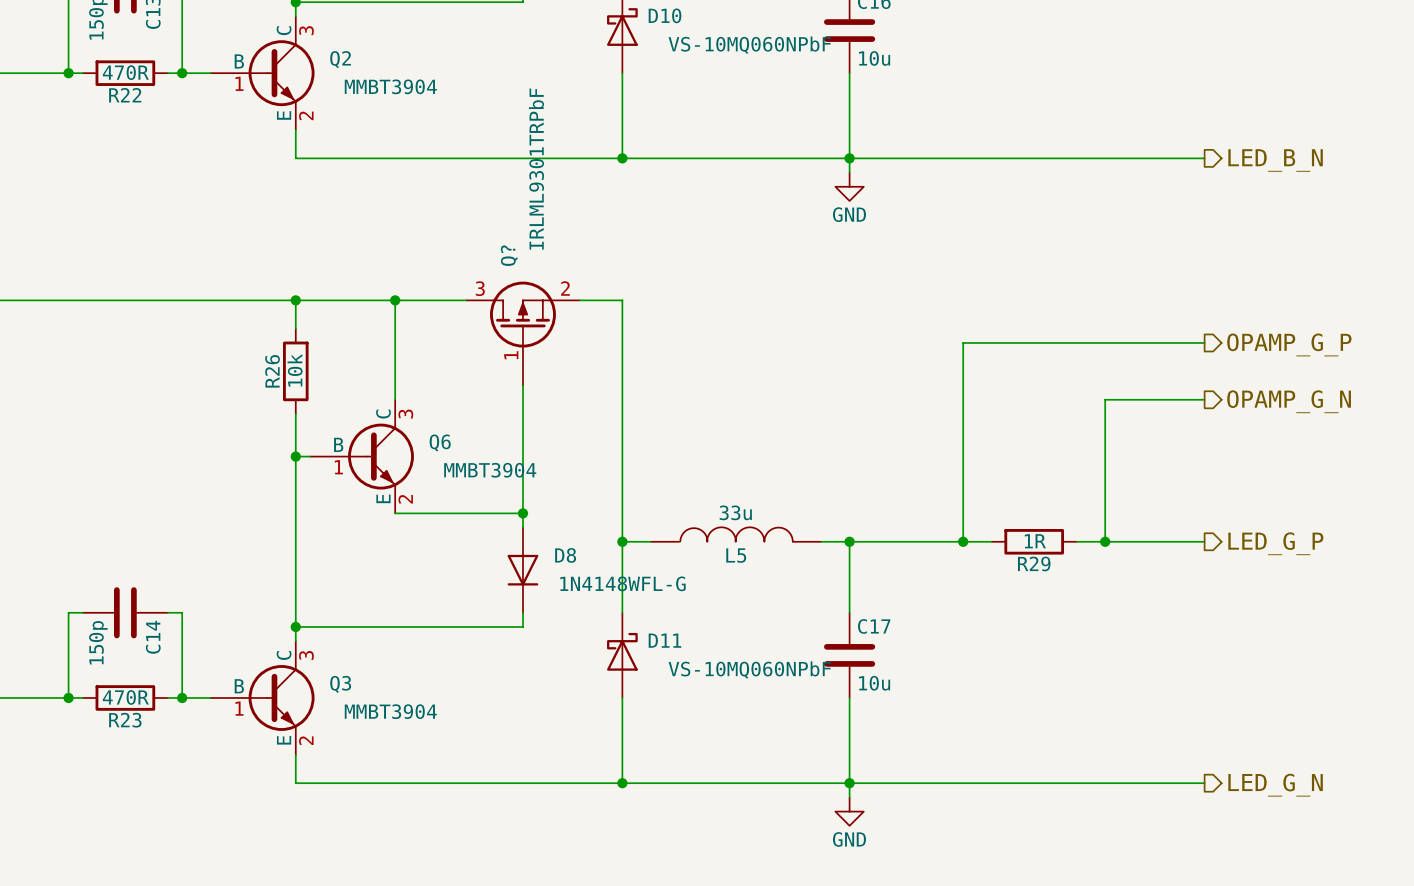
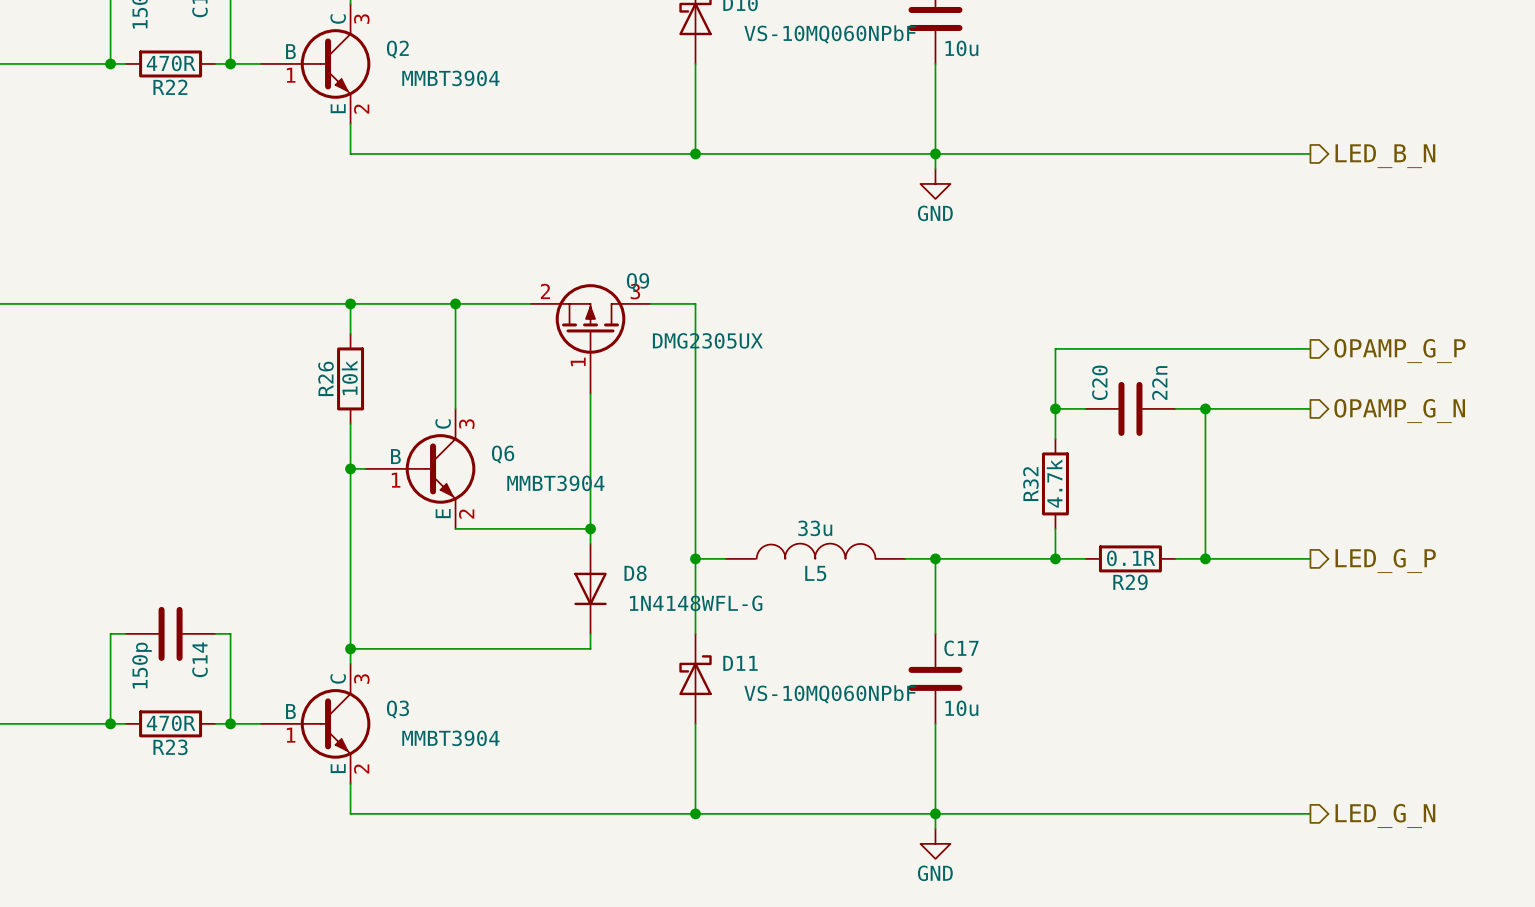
Q?: IRLML9301TRPbF (522, 333) -> none
Q9: none -> DMG2305UX (590, 339)
wire: none -> (1055, 408) (1085, 408)
junction: none -> (1055, 408)
C20: none -> 22n (1130, 408)
wire: none -> (1175, 408) (1205, 408)
junction: none -> (1205, 408)
wire: (963, 428) (963, 513) -> none
R32: none -> 4.7k (1055, 483)
R29 value: 1R (1035, 541) -> 0.1R (1131, 558)

